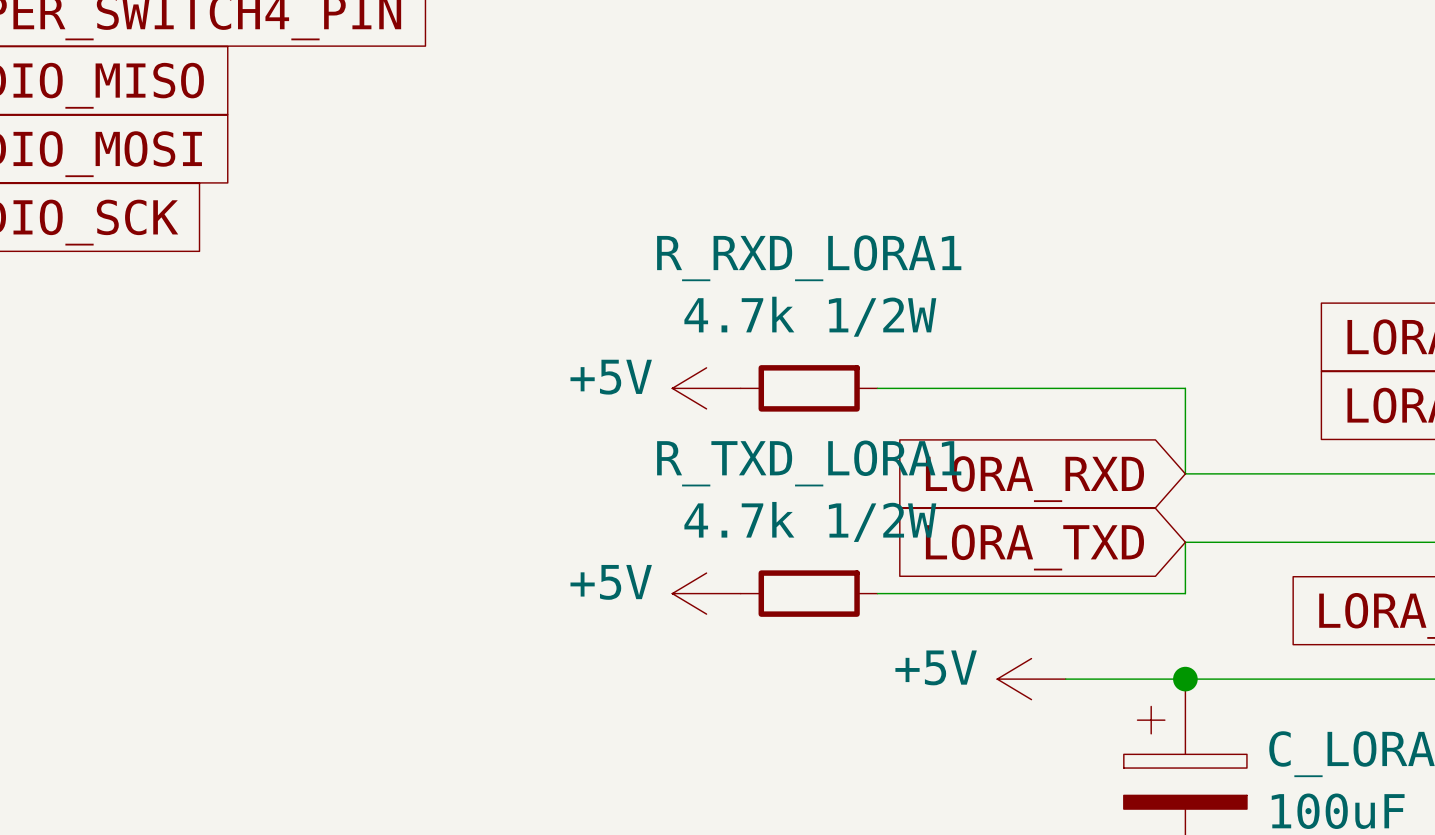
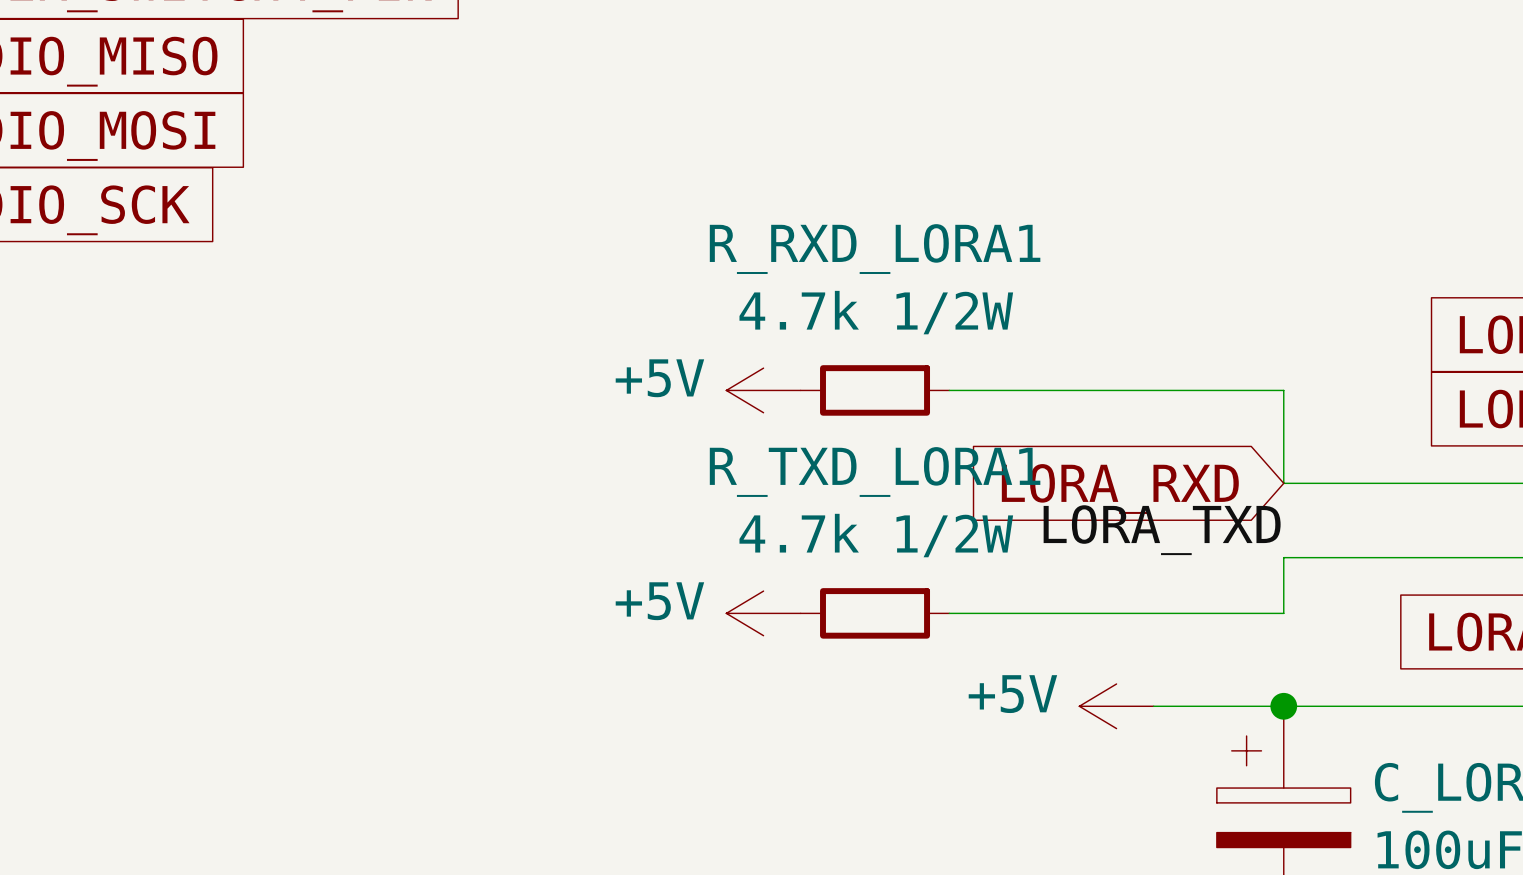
label: none -> LORA_TXD (1162, 530)
global label: LORA_TXD (1034, 547) -> none

